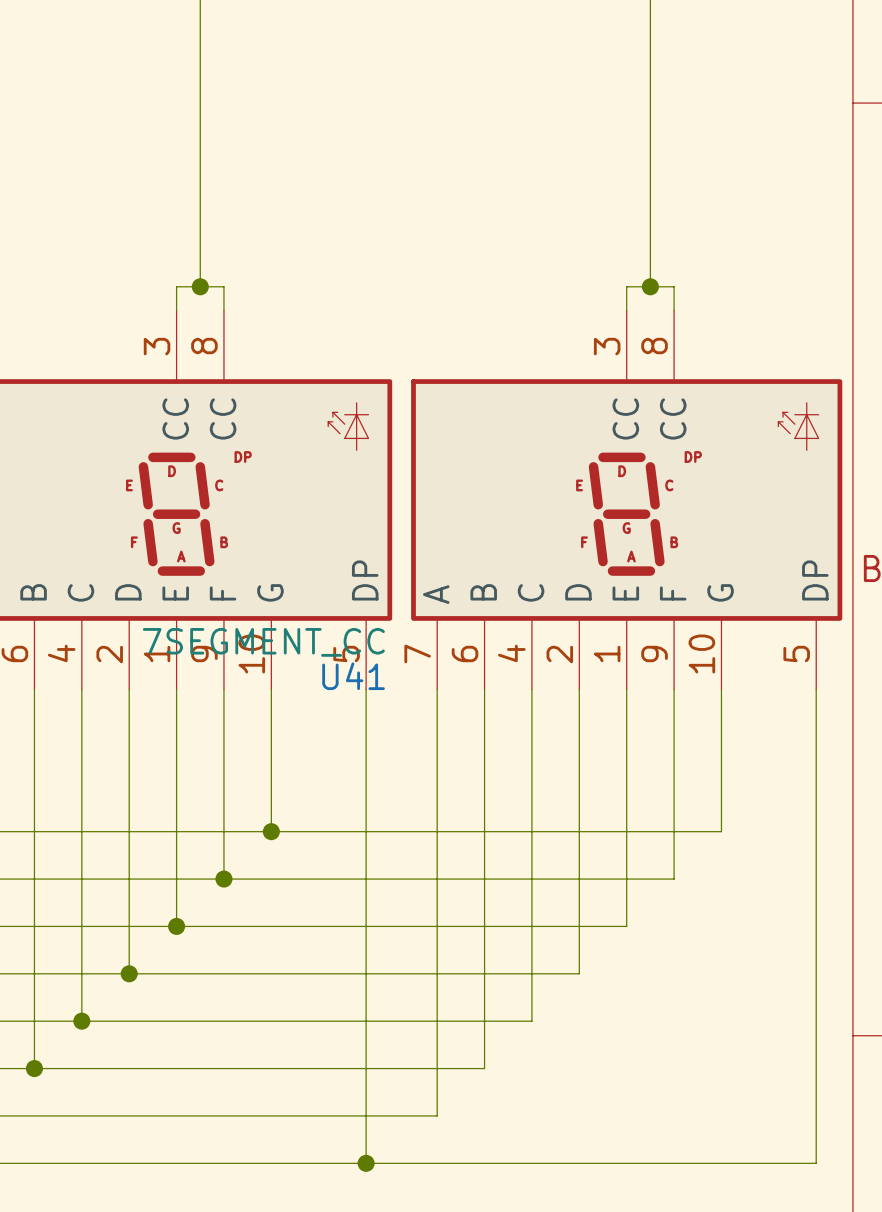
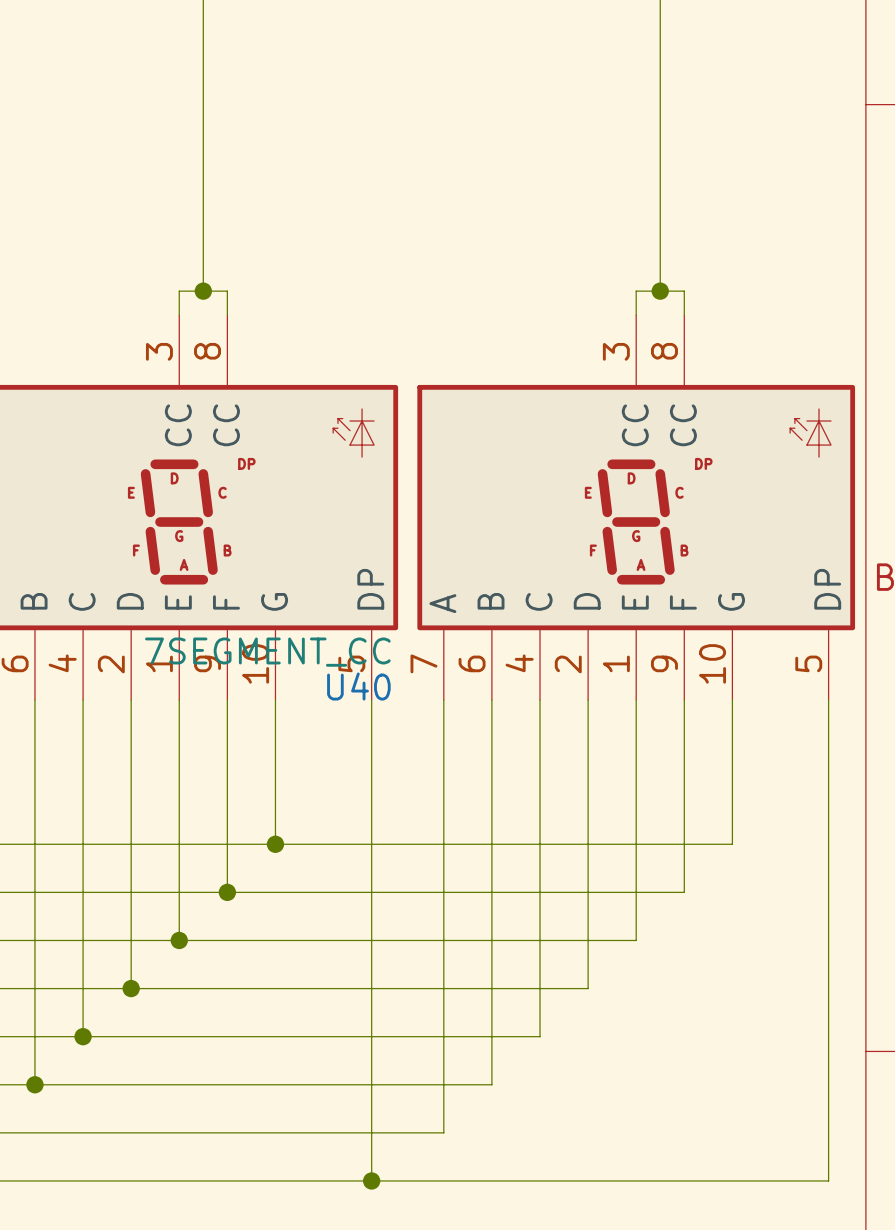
U41 name: U41 (353, 676) -> U40 (358, 686)

